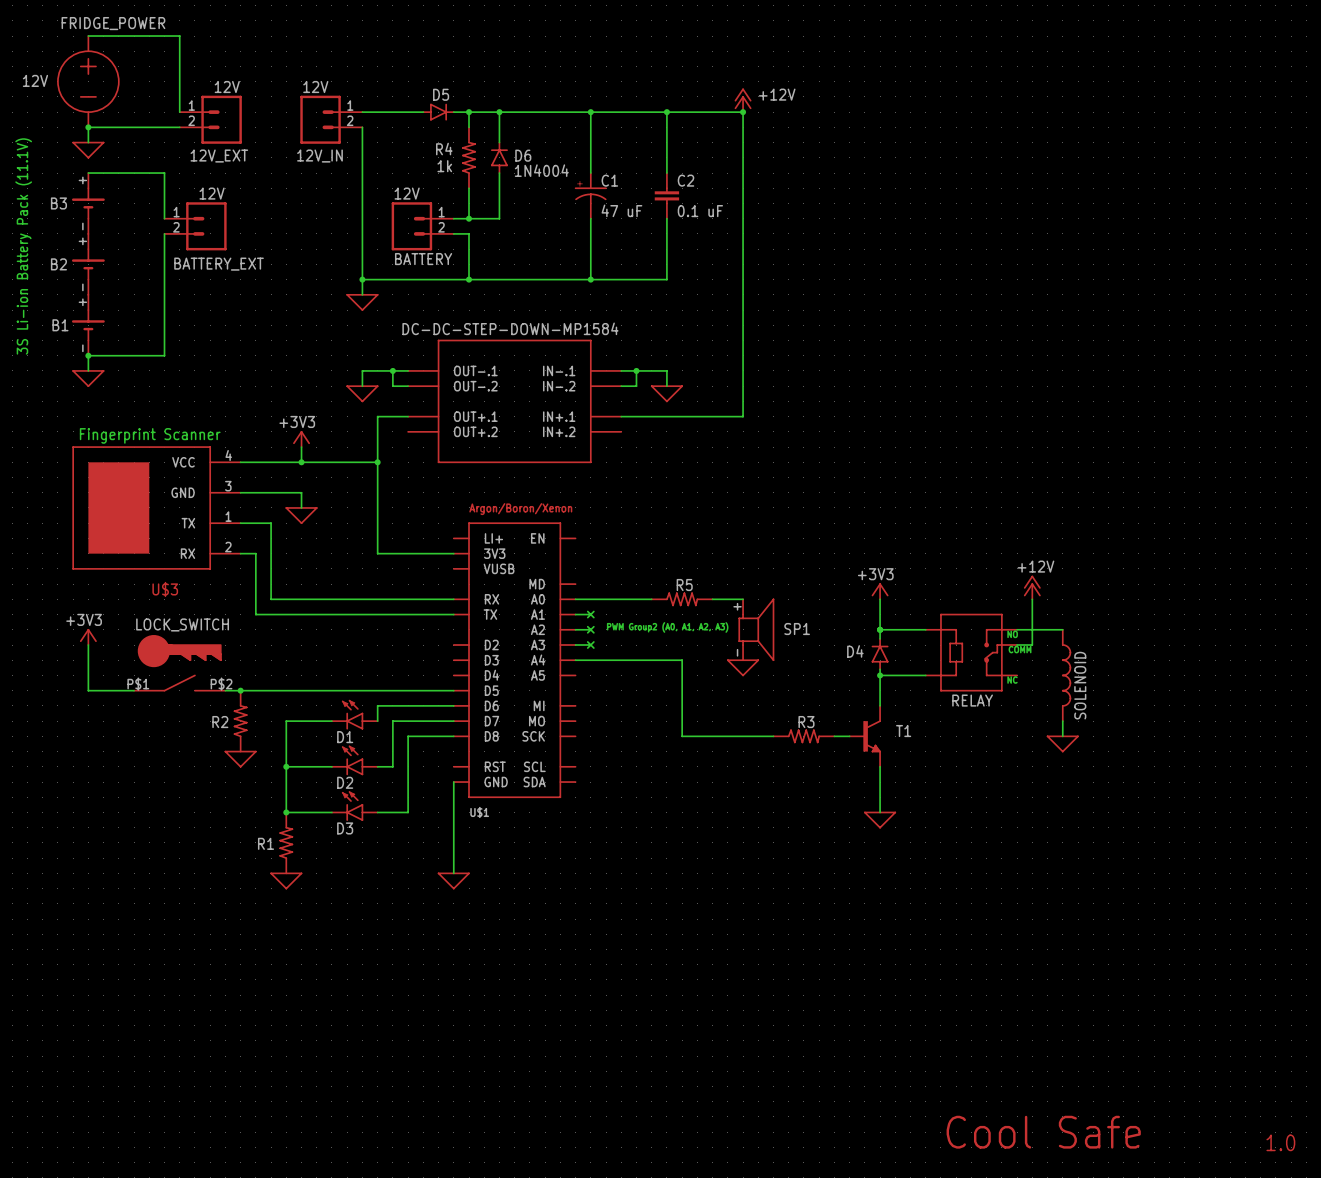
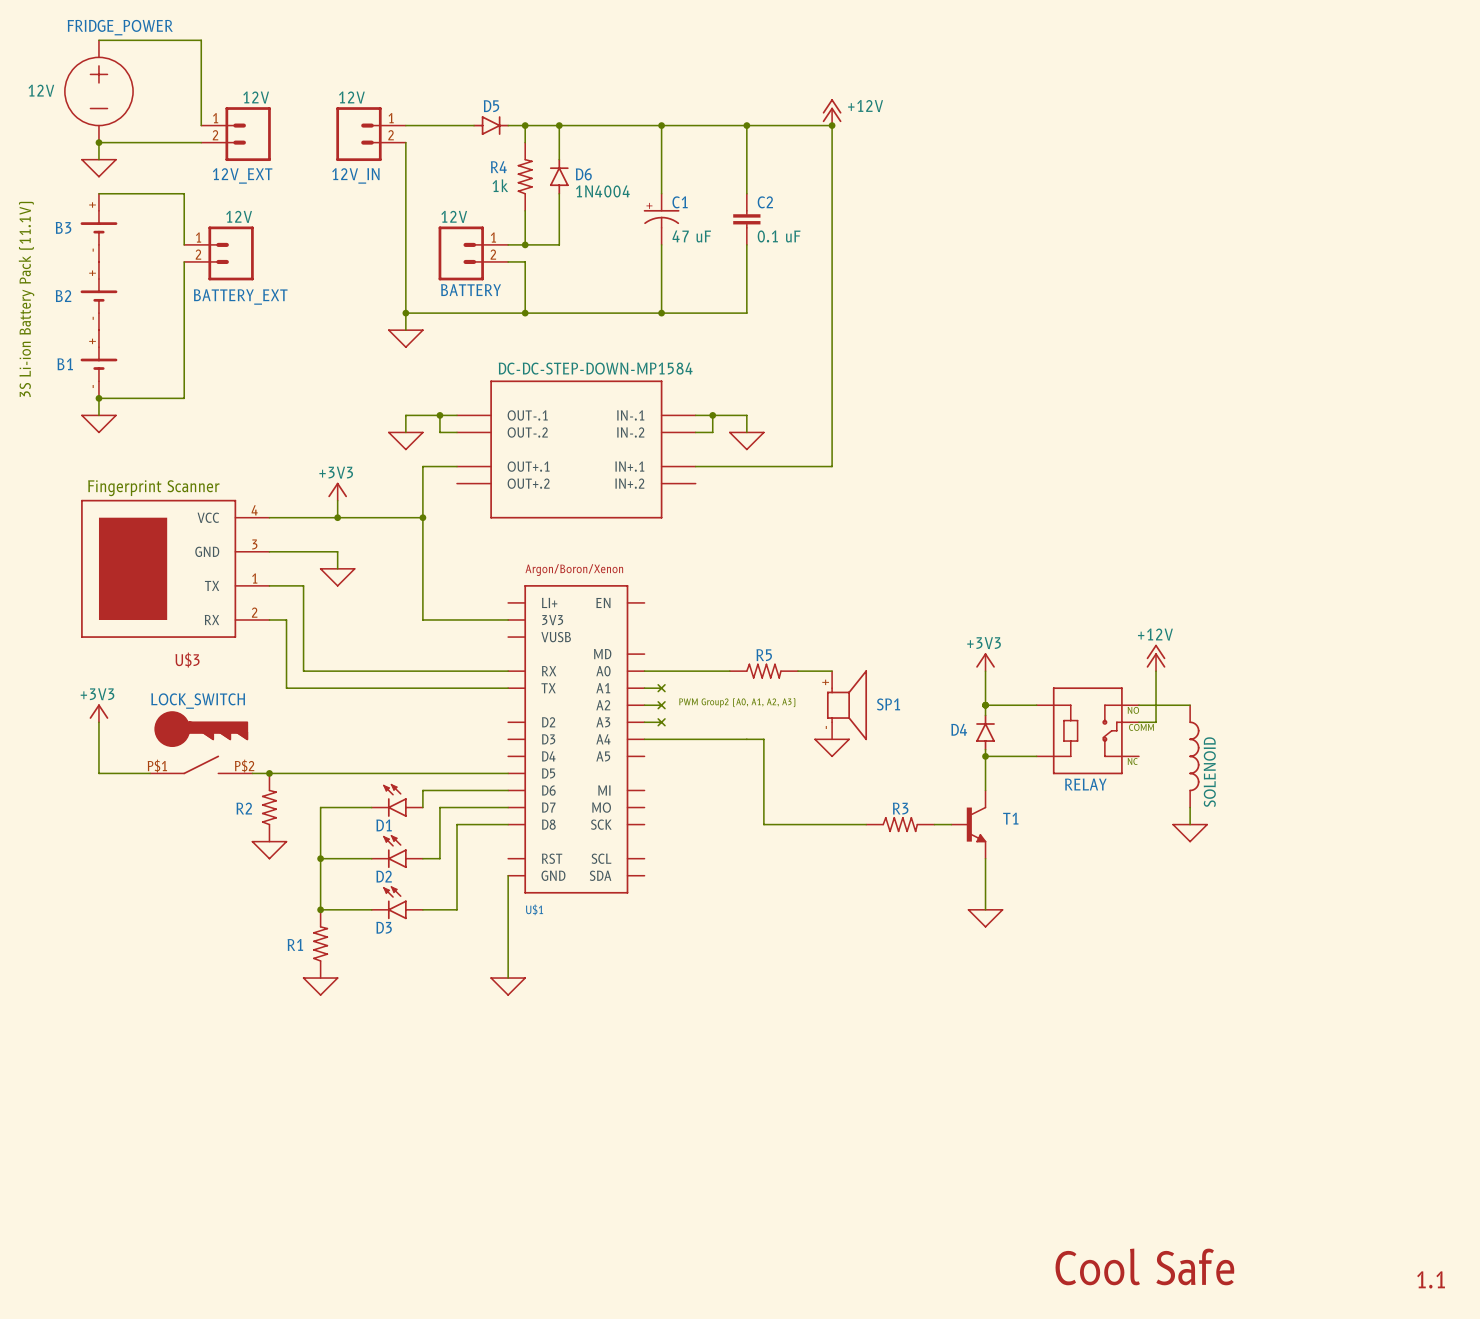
text: 1.0 (1280, 1142) -> 1.1 (1431, 1279)

